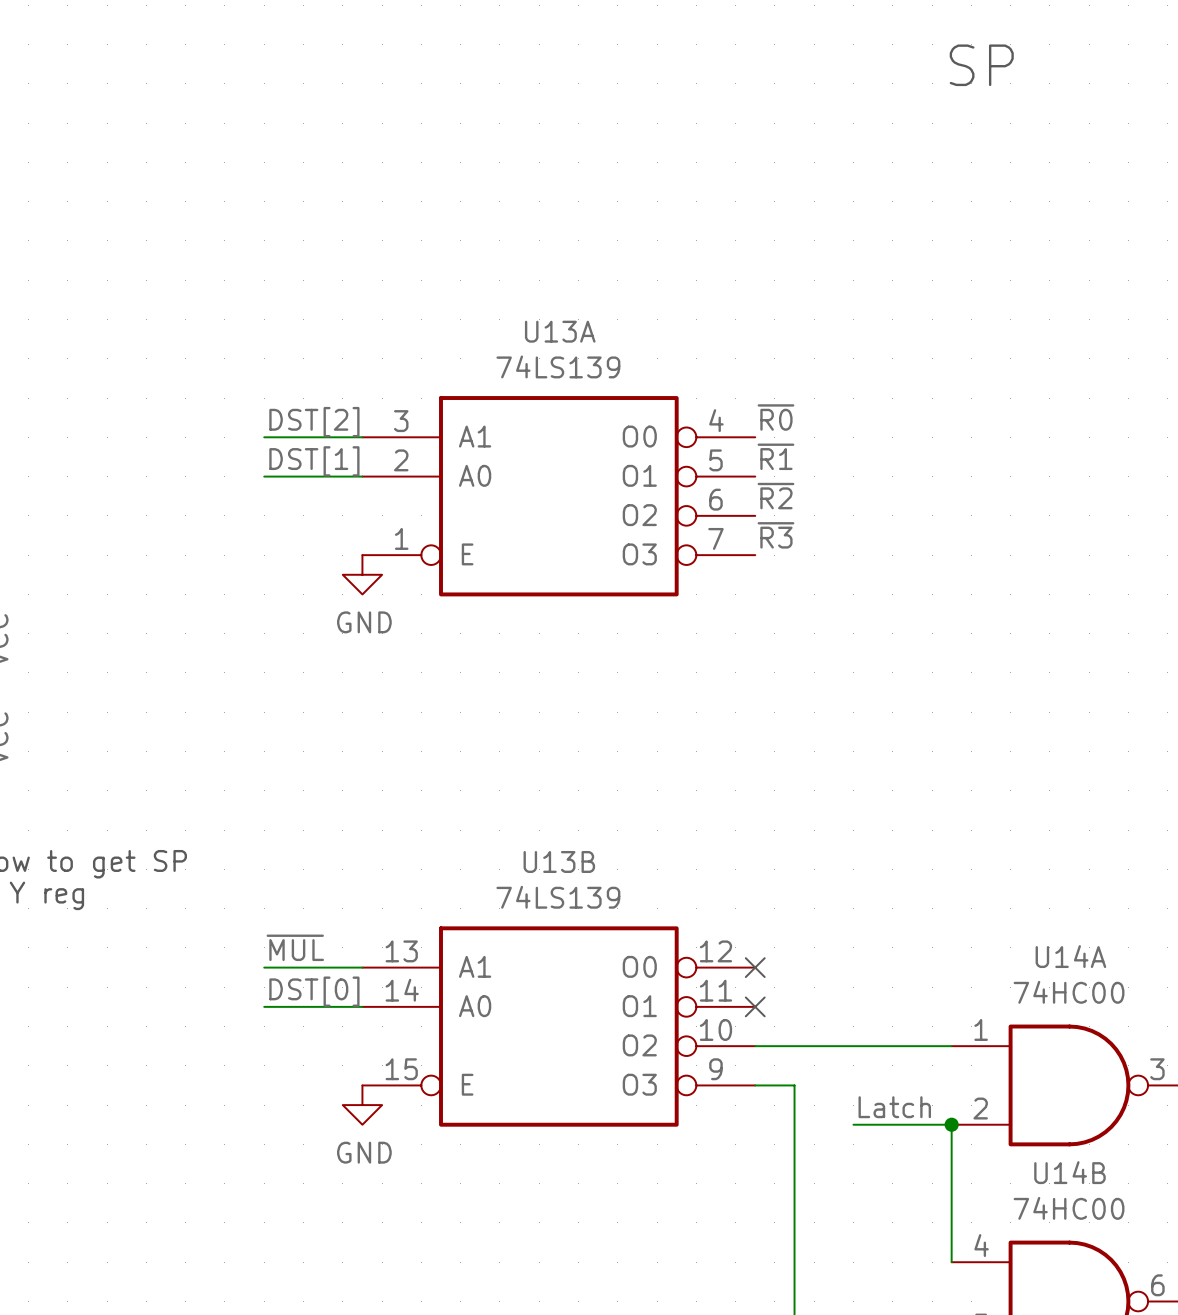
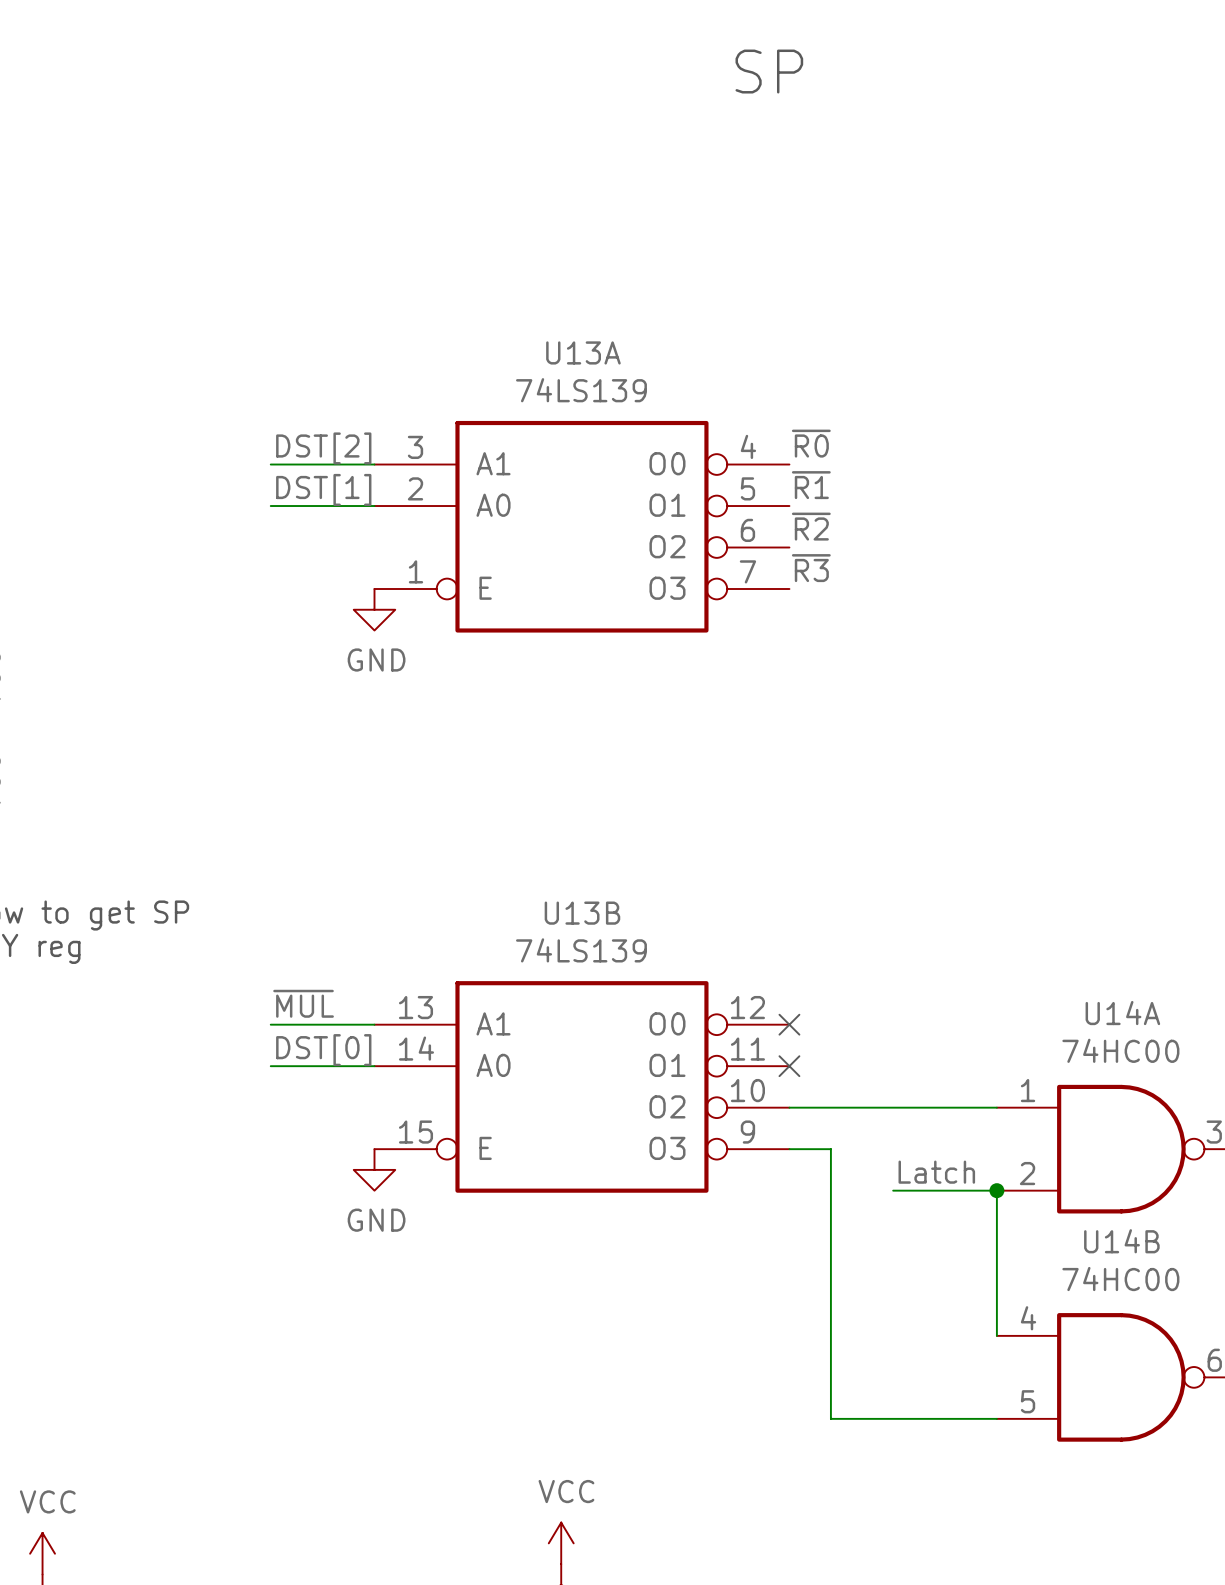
text position: SP (981, 65) -> SP (769, 71)

